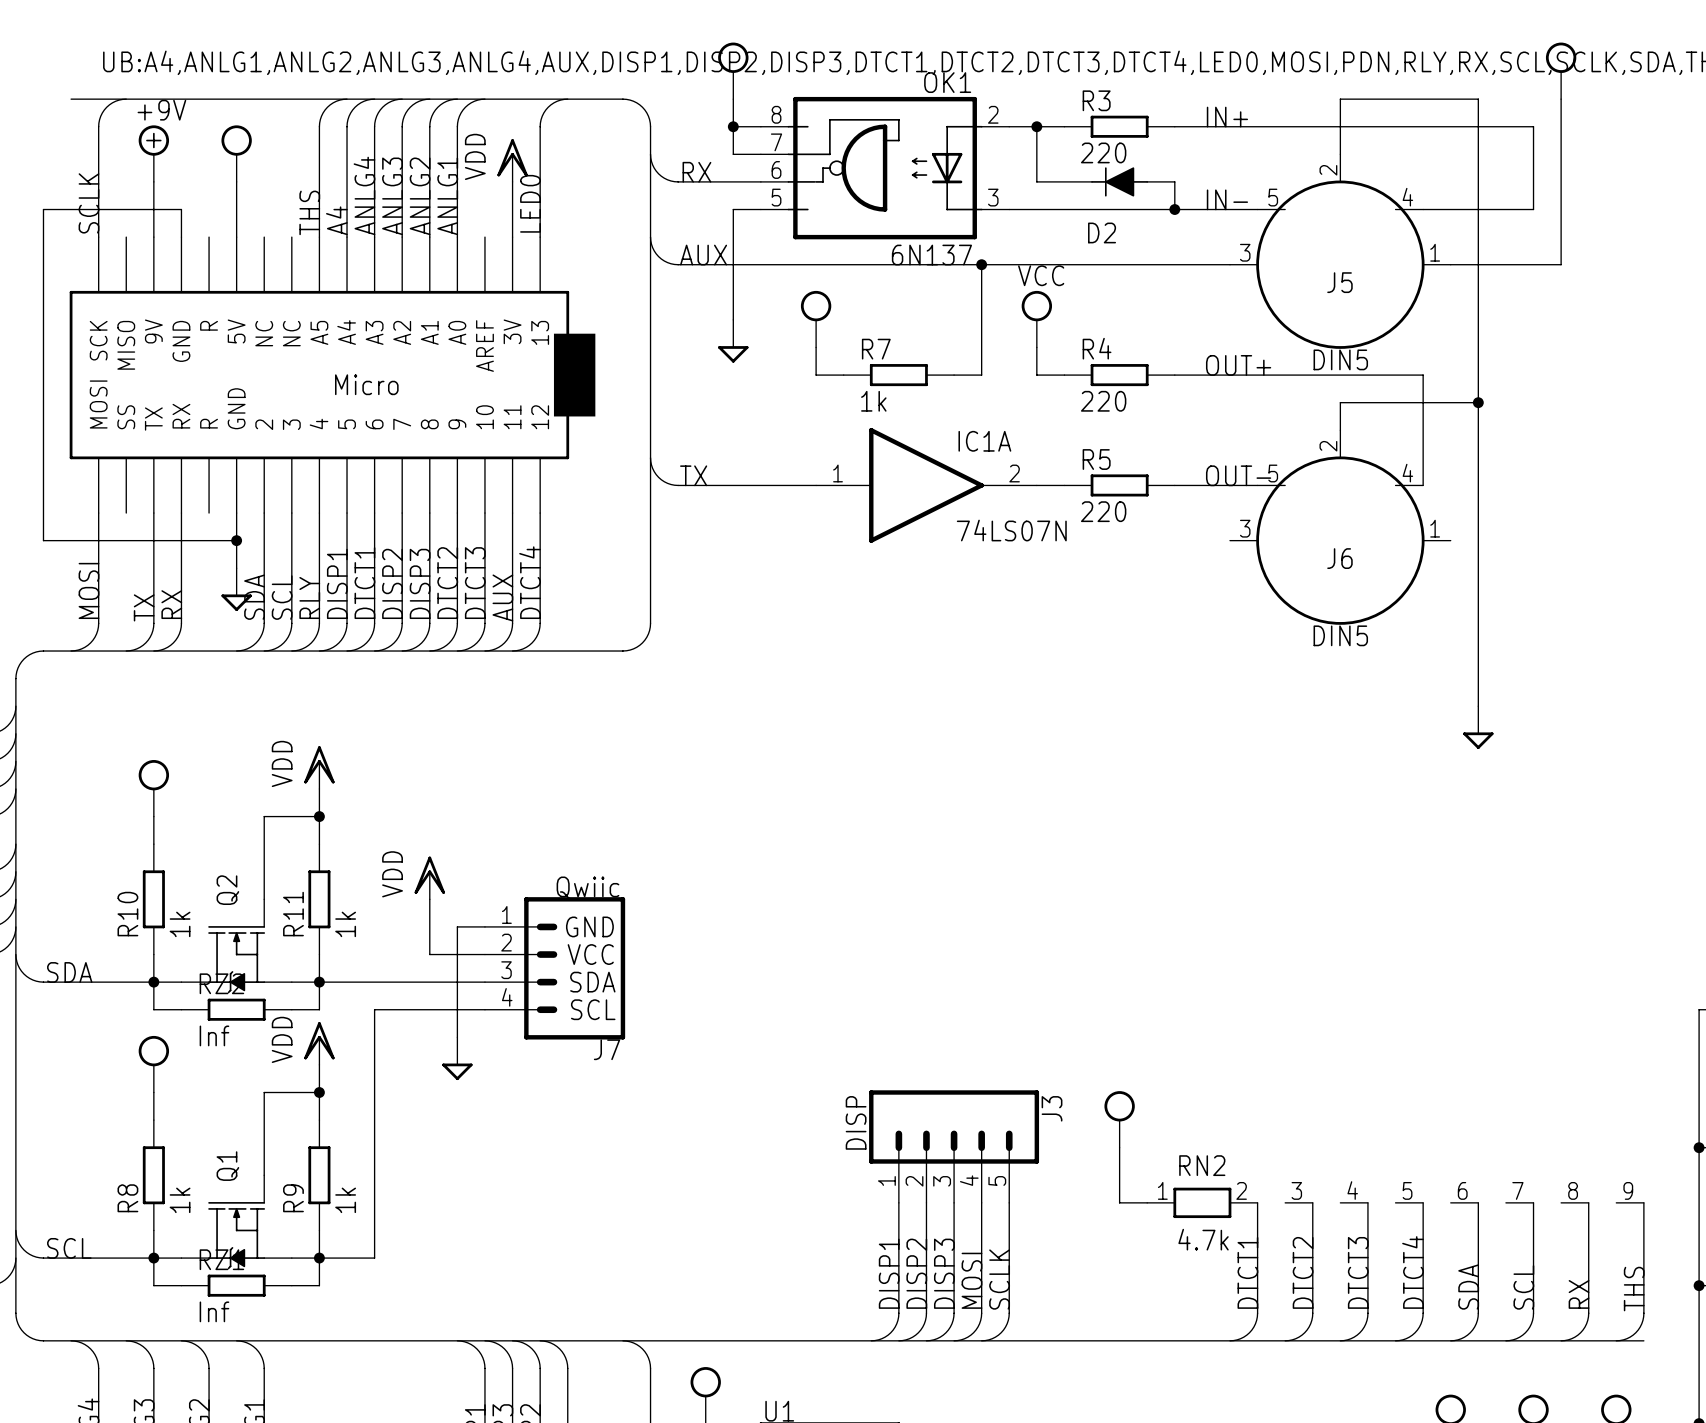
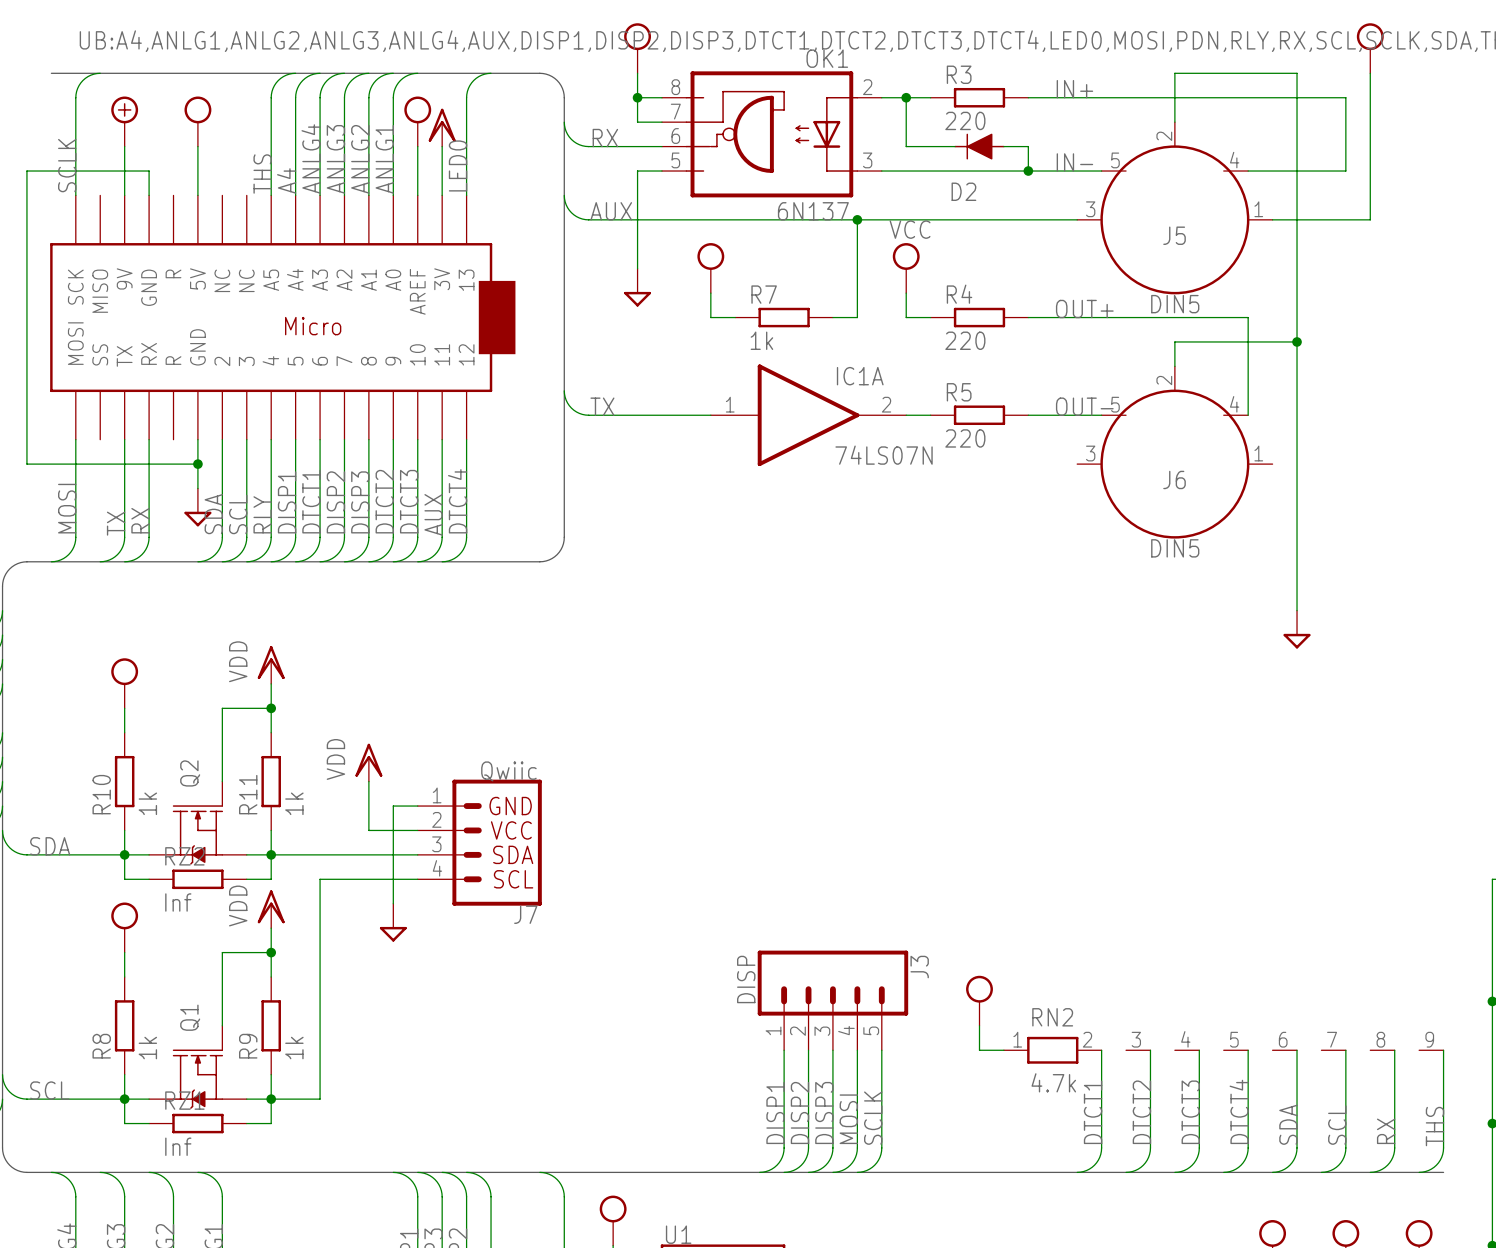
power symbol text: +9V (161, 110) -> none
power symbol: none -> (417, 121)
power symbol text: VDD (475, 156) -> none
wire: none -> (417, 146) (417, 195)
power symbol position: (1119, 1119) -> (979, 1000)

